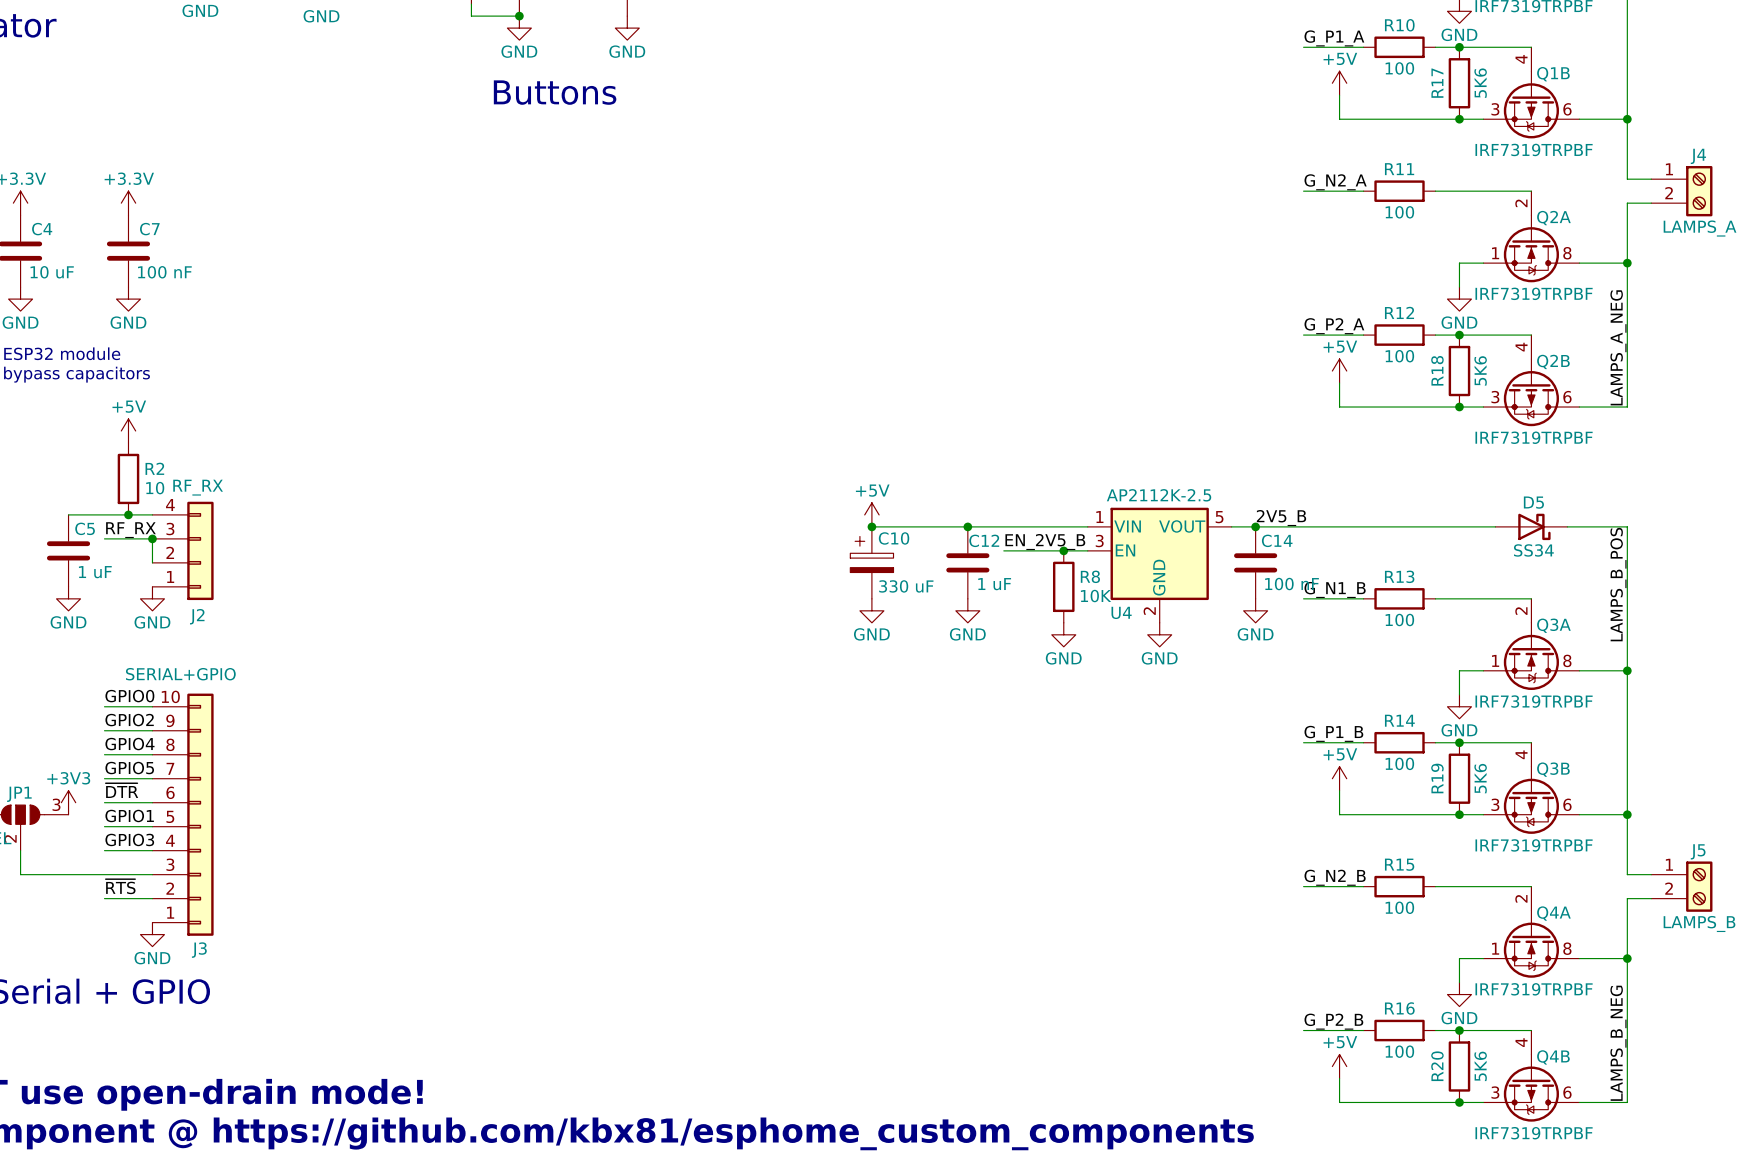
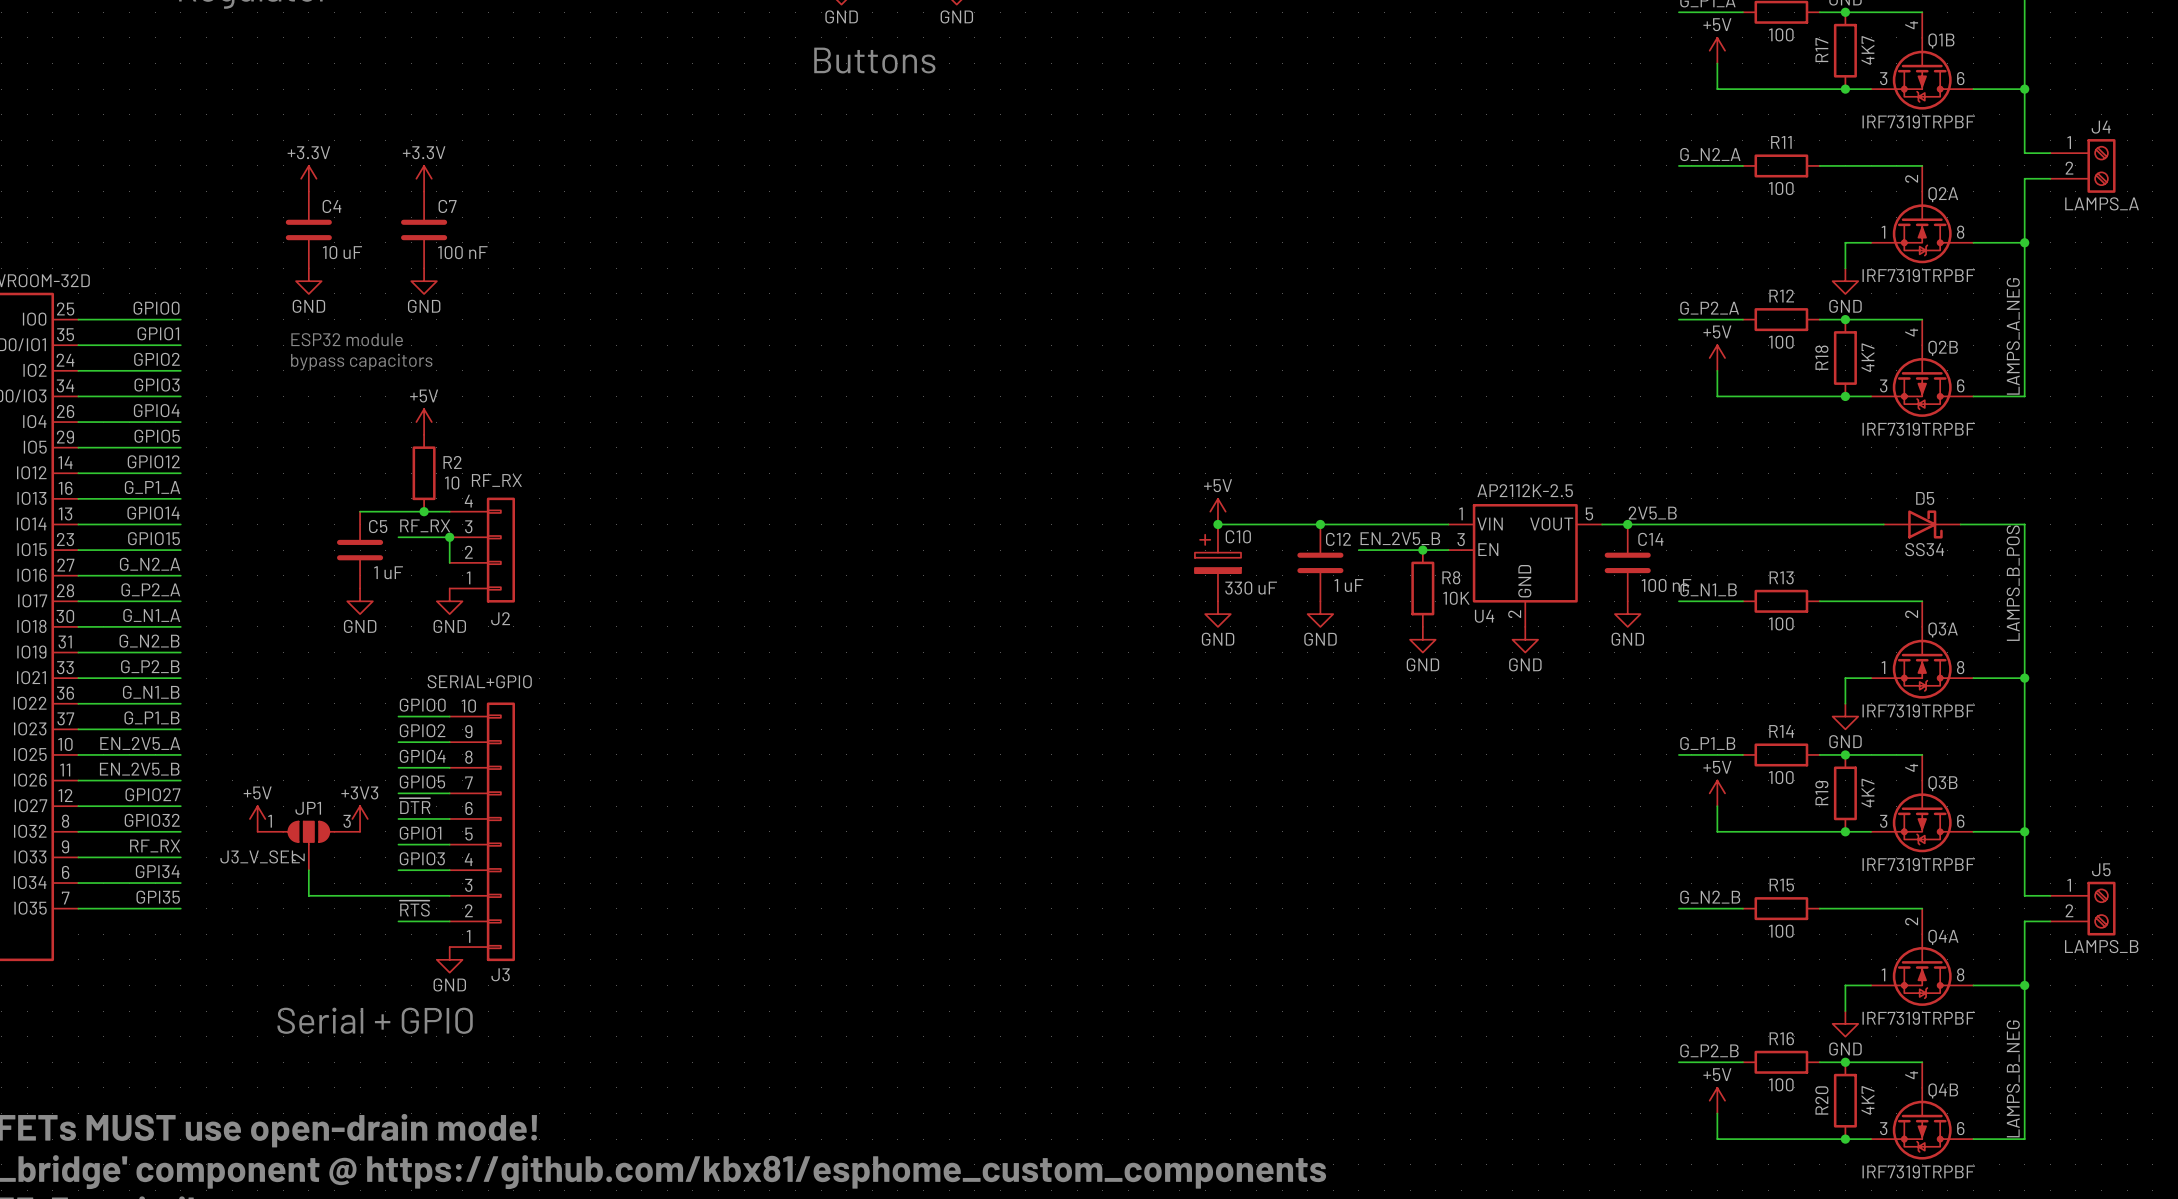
R17 value: 5K6 (1480, 83) -> 4K7 (1867, 50)
R18 value: 5K6 (1480, 370) -> 4K7 (1867, 357)
R19 value: 5K6 (1480, 778) -> 4K7 (1867, 793)
R20 value: 5K6 (1480, 1066) -> 4K7 (1867, 1100)

